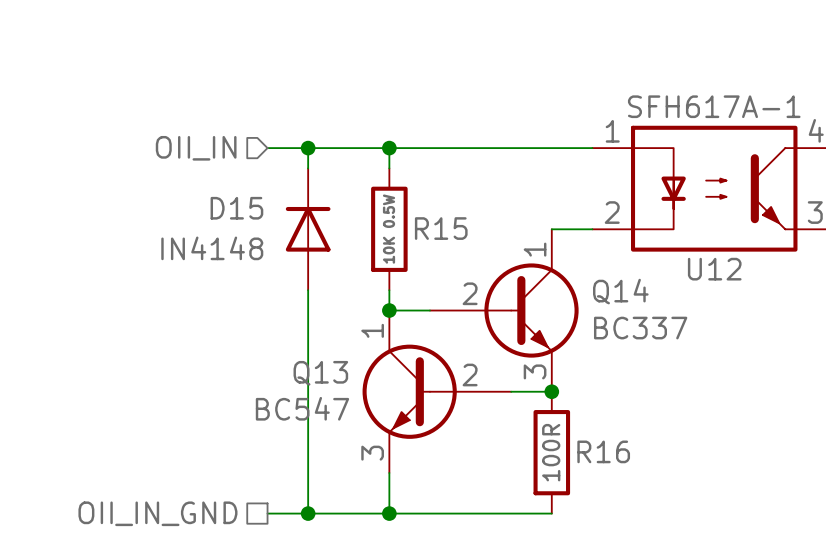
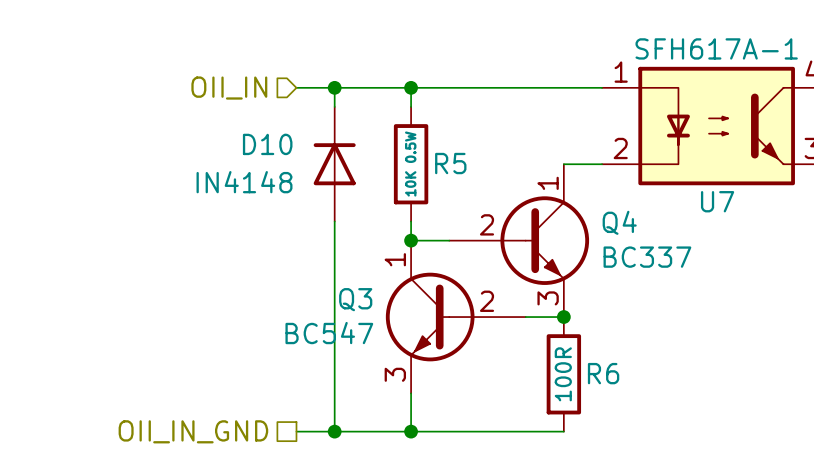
D15 name: D15 (236, 208) -> D10 (267, 144)
R15 name: R15 (441, 228) -> R5 (450, 163)
U12 name: U12 (714, 269) -> U7 (717, 201)
Q14 name: Q14 (620, 291) -> Q4 (619, 222)
Q13 name: Q13 (320, 373) -> Q3 (355, 299)
R16 name: R16 (603, 451) -> R6 (603, 373)

